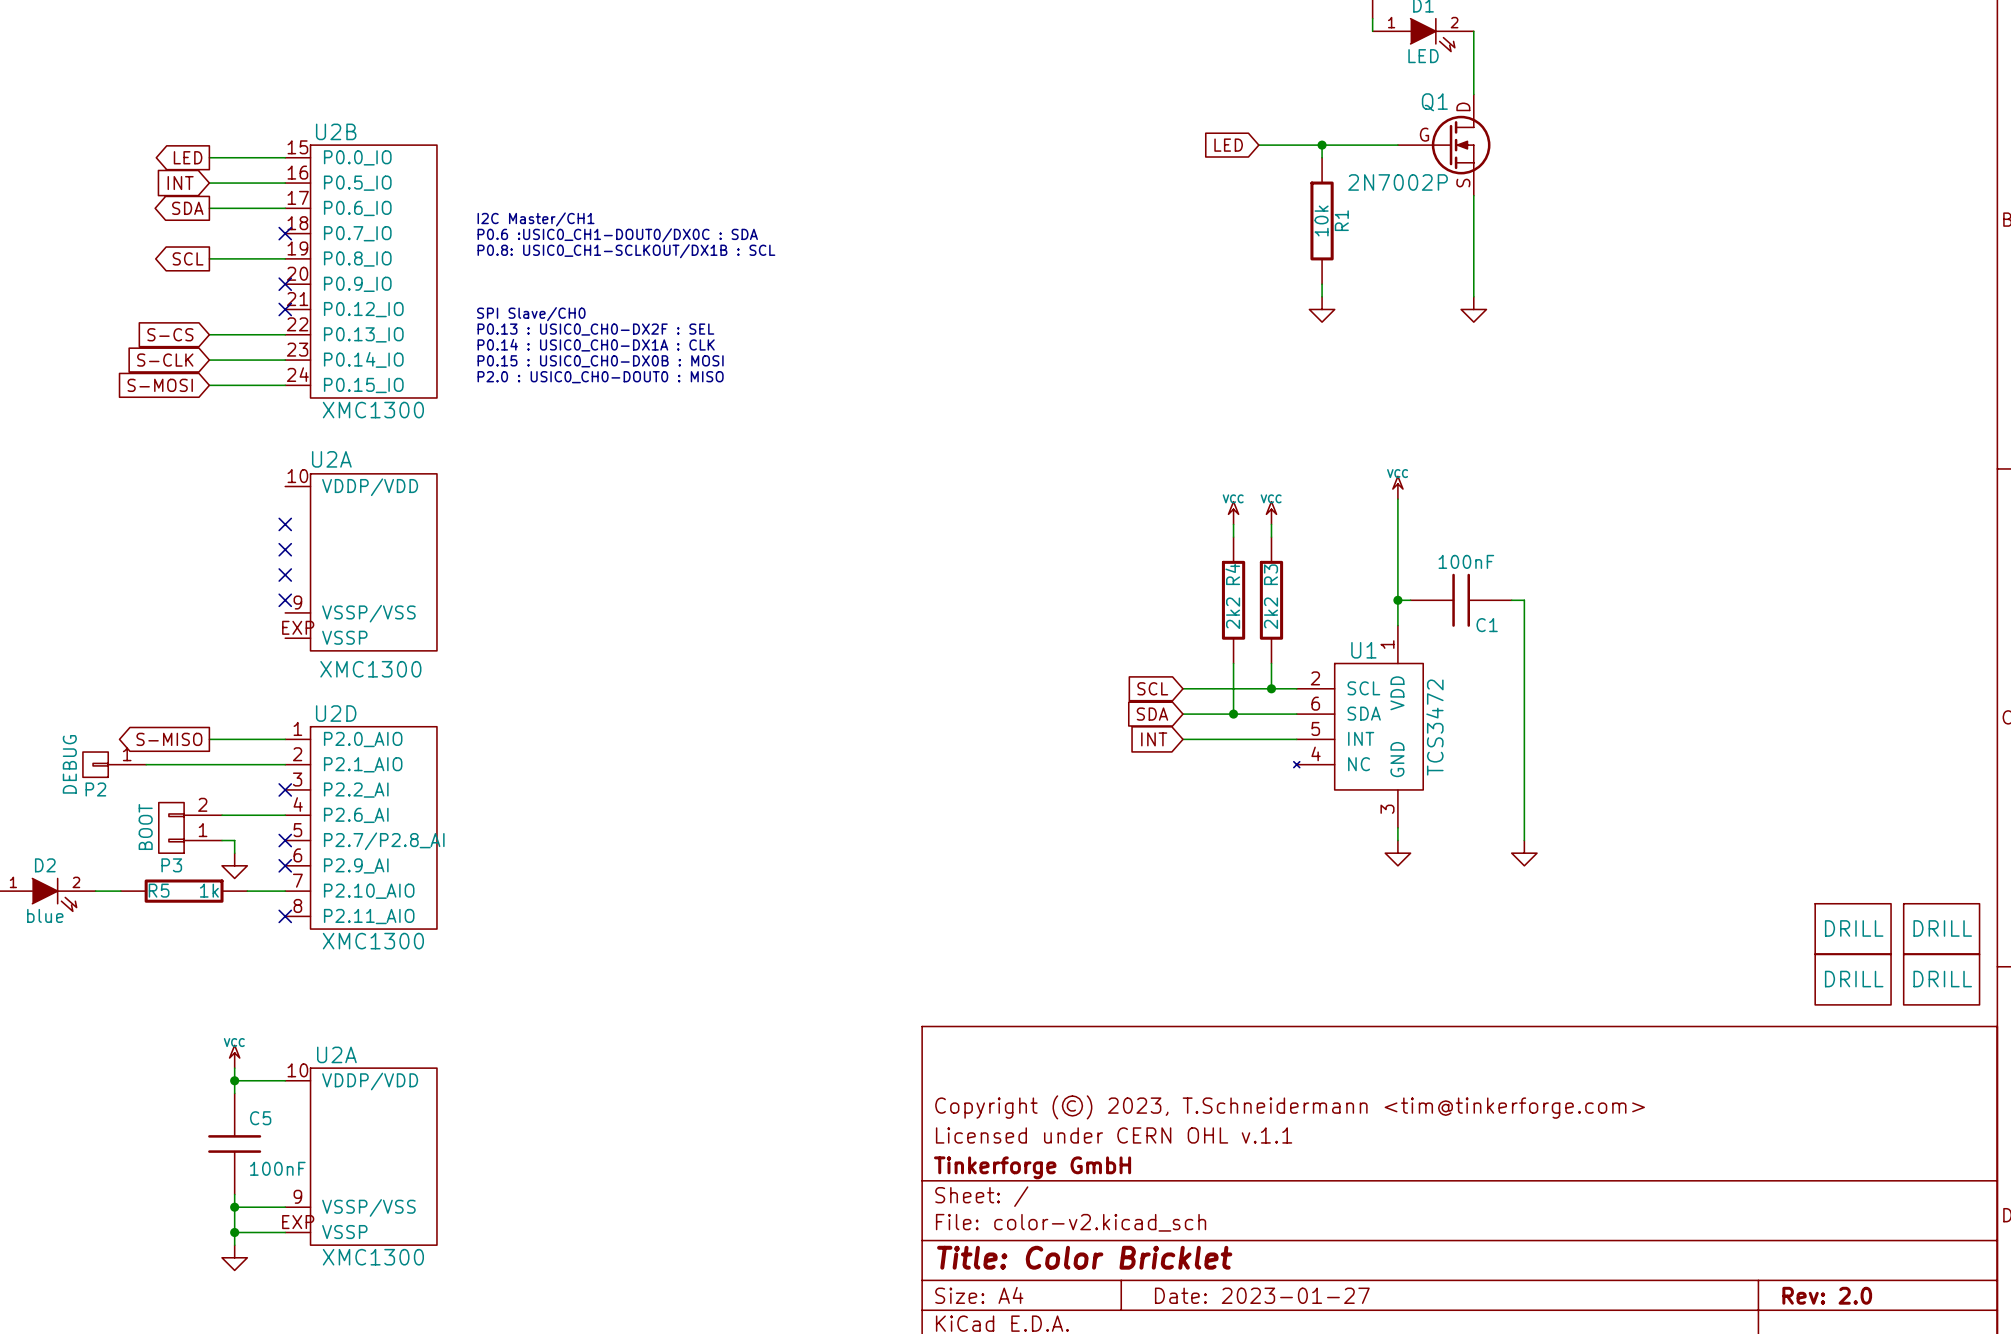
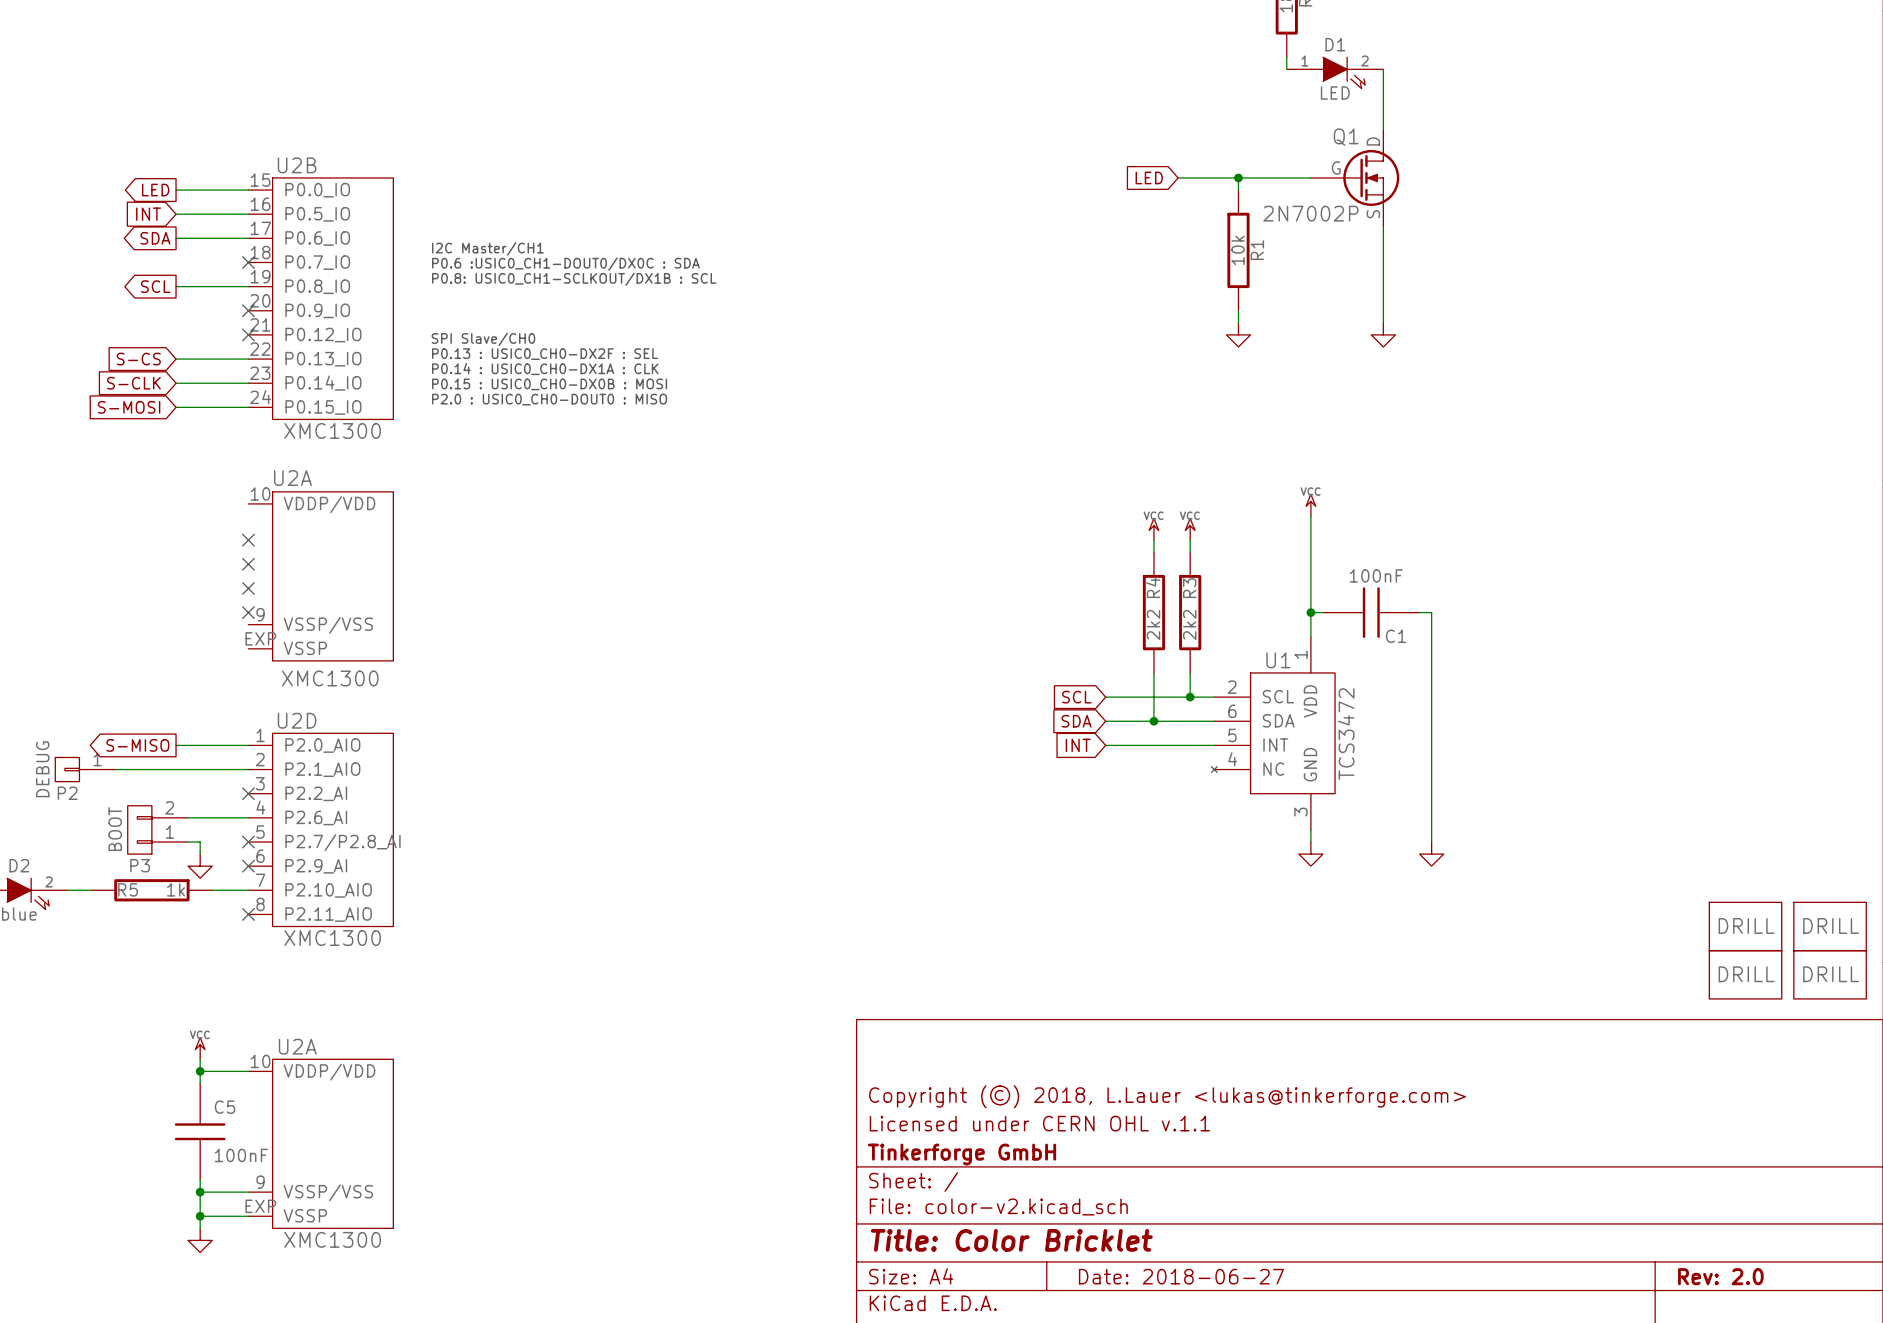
title block: Copyright (©) 2023, T.Schneidermann <tim@tinkerforge.com> (1290, 1107) -> Copyright (©) 2018, L.Lauer <lukas@tinkerforge.com> (1167, 1096)
title block: Date: 2023-01-27 (1262, 1295) -> Date: 2018-06-27 (1181, 1276)

